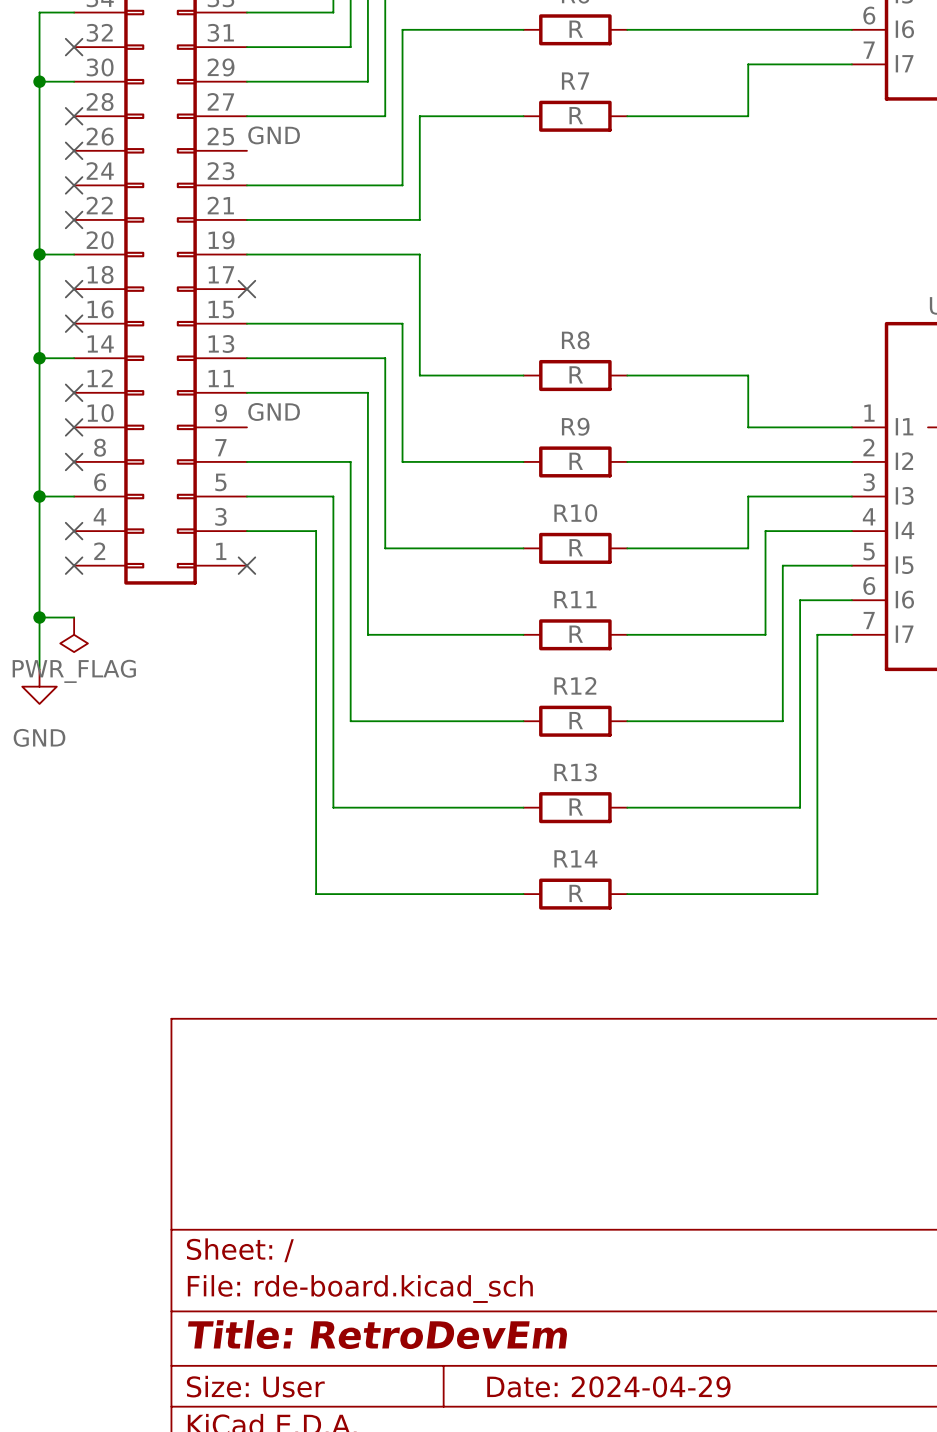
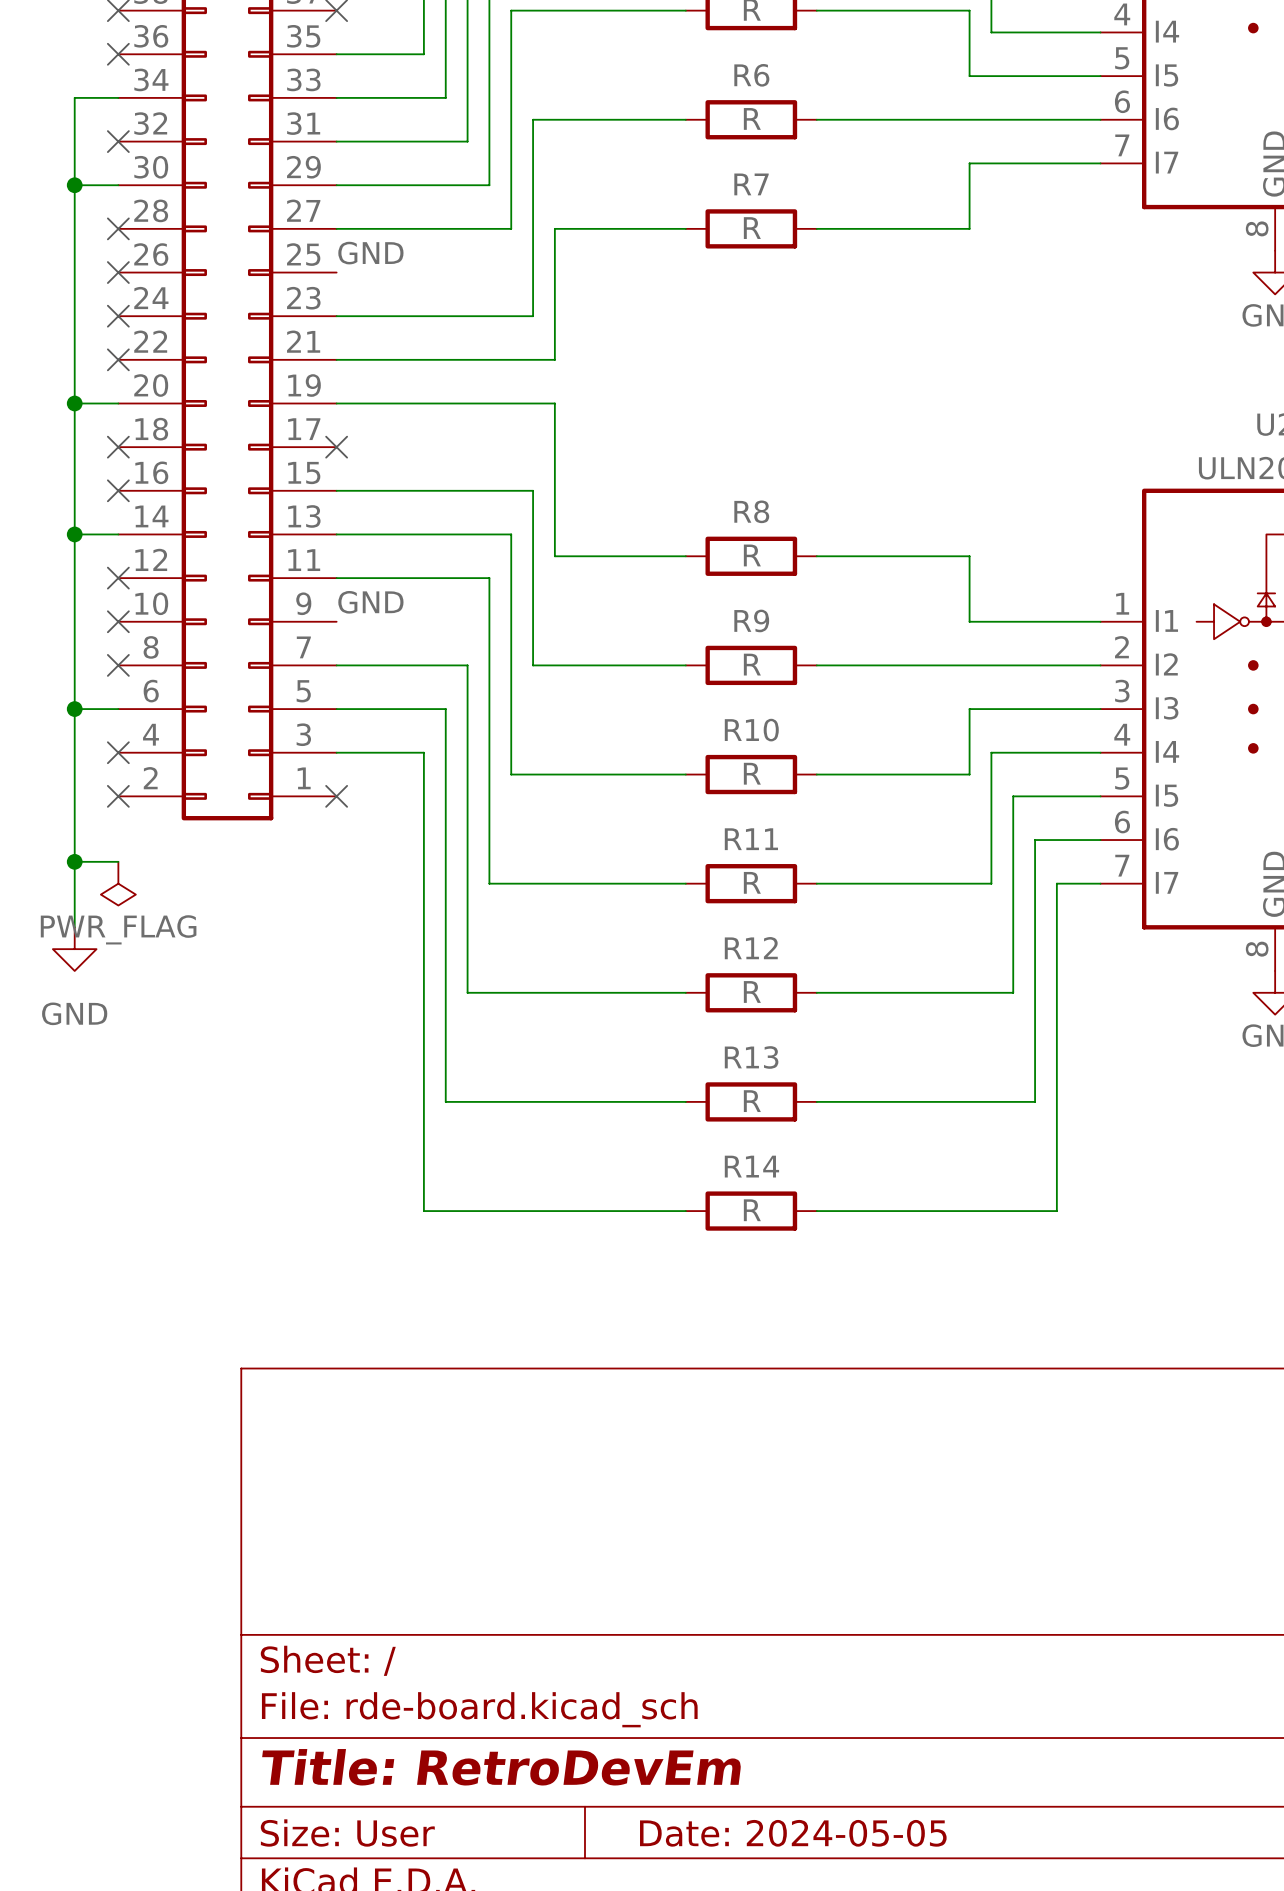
title block: Date: 2024-04-29 (608, 1386) -> Date: 2024-05-05 (793, 1833)

